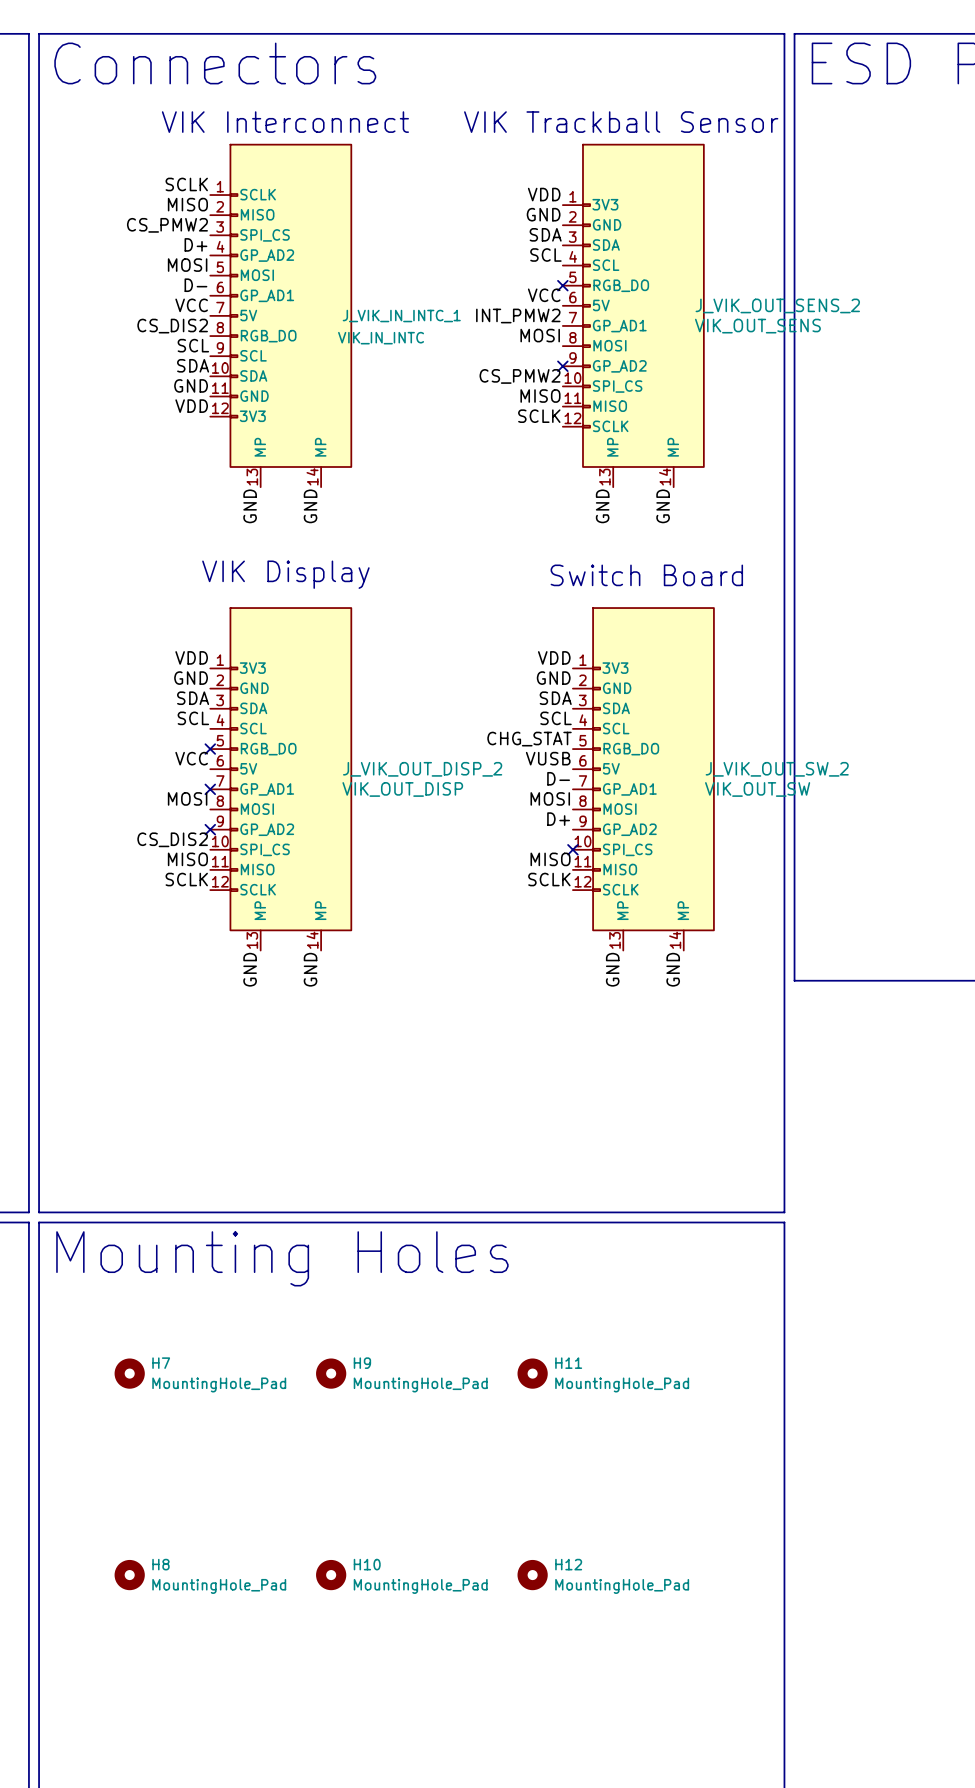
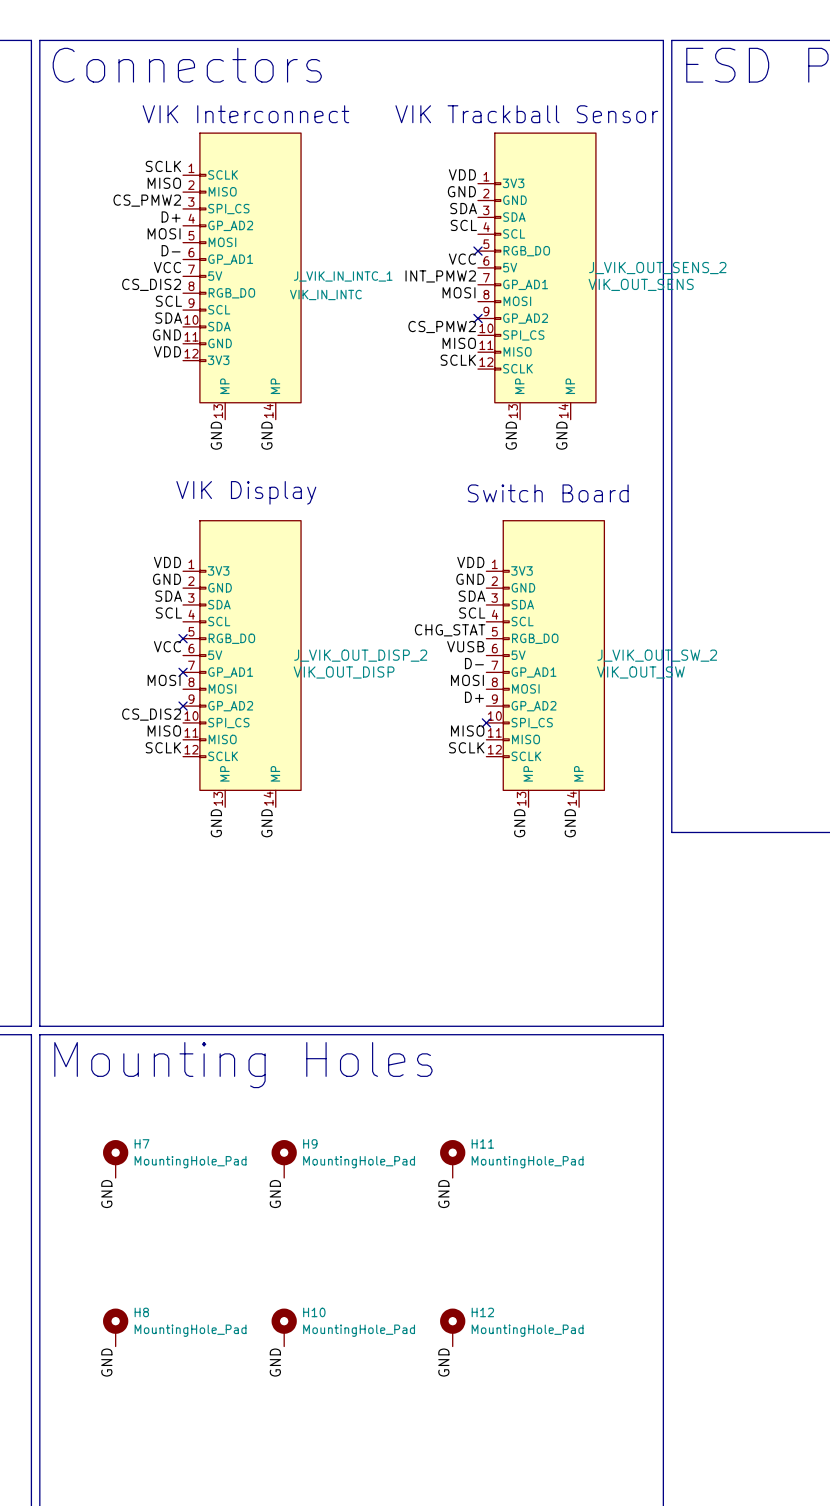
H7 symbol: [114, 1358, 145, 1389] -> [103, 1140, 129, 1178]
H9 symbol: [316, 1358, 347, 1389] -> [271, 1140, 297, 1178]
H11 symbol: [517, 1358, 548, 1389] -> [440, 1140, 466, 1178]
label: none -> GND (106, 1194)
label: none -> GND (275, 1194)
label: none -> GND (443, 1194)
H8 symbol: [114, 1559, 145, 1591] -> [103, 1308, 129, 1347]
H10 symbol: [316, 1559, 347, 1591] -> [271, 1308, 297, 1347]
H12 symbol: [517, 1559, 548, 1591] -> [440, 1308, 466, 1347]
label: none -> GND (106, 1362)
label: none -> GND (275, 1362)
label: none -> GND (443, 1362)

